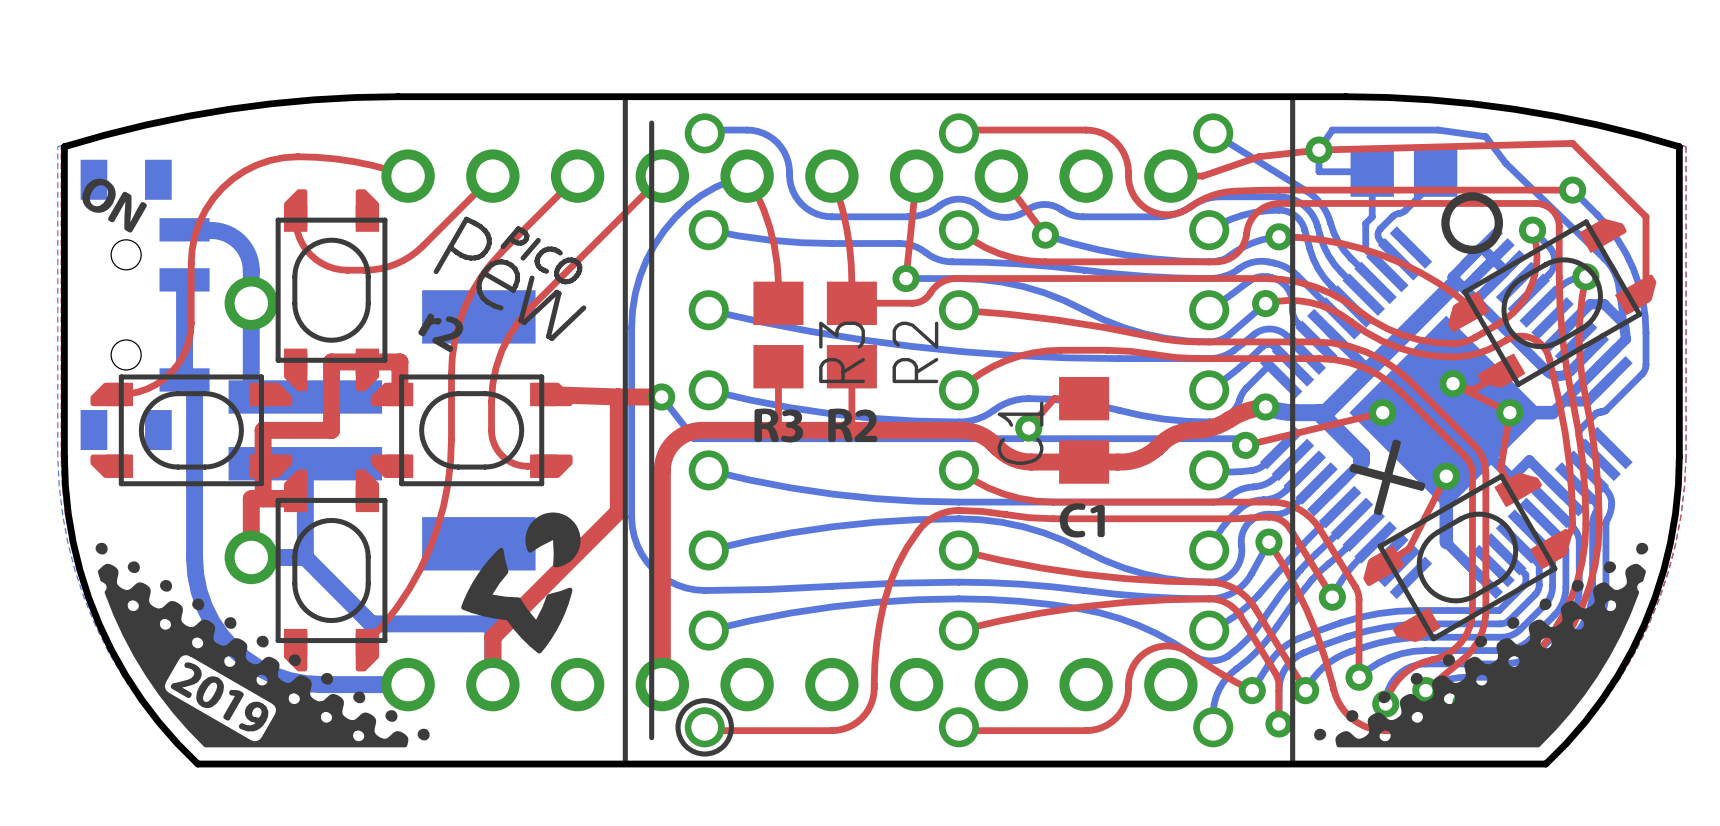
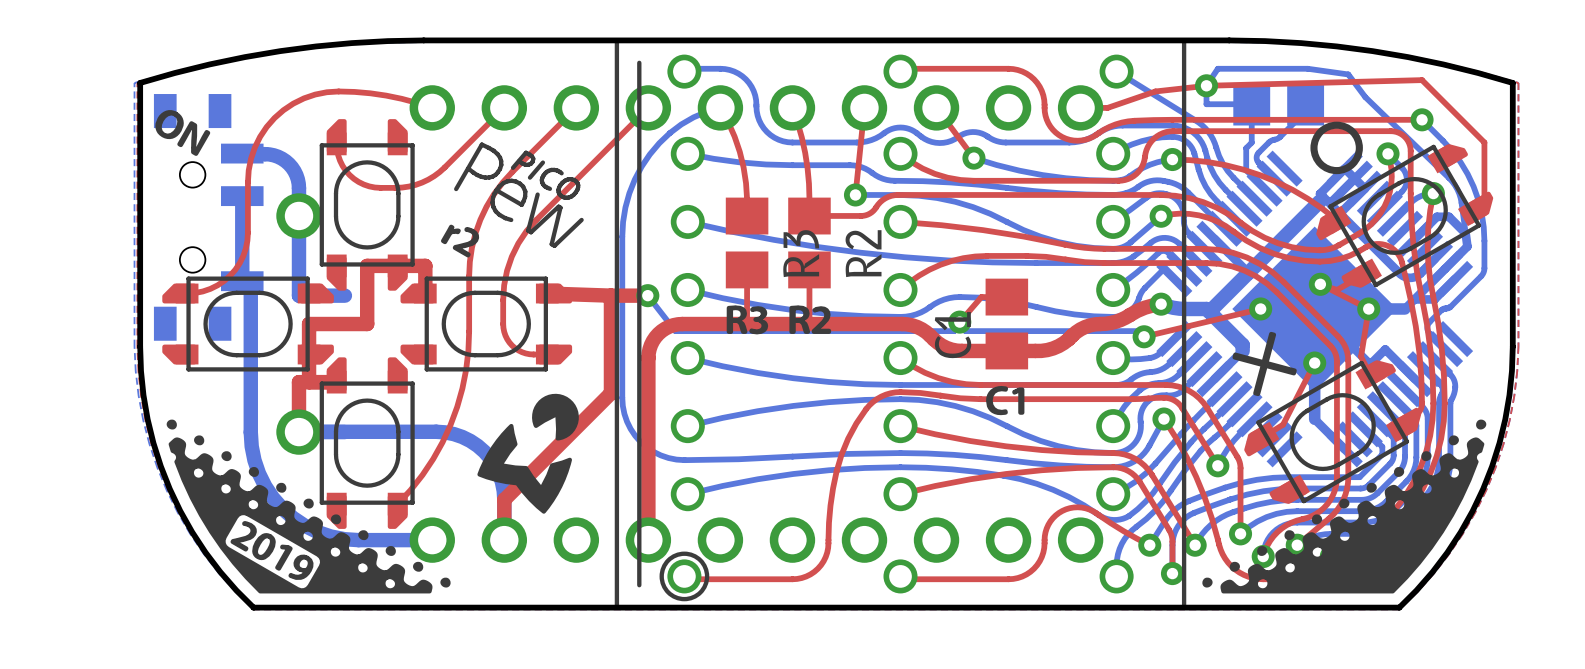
part: (382, 430) -> none
bottom track: (305, 463) (305, 557) (371, 623) (492, 623) (492, 637) -> (298, 431) (436, 431) (453, 434) (470, 440) (490, 458) (502, 482) (504, 499)

